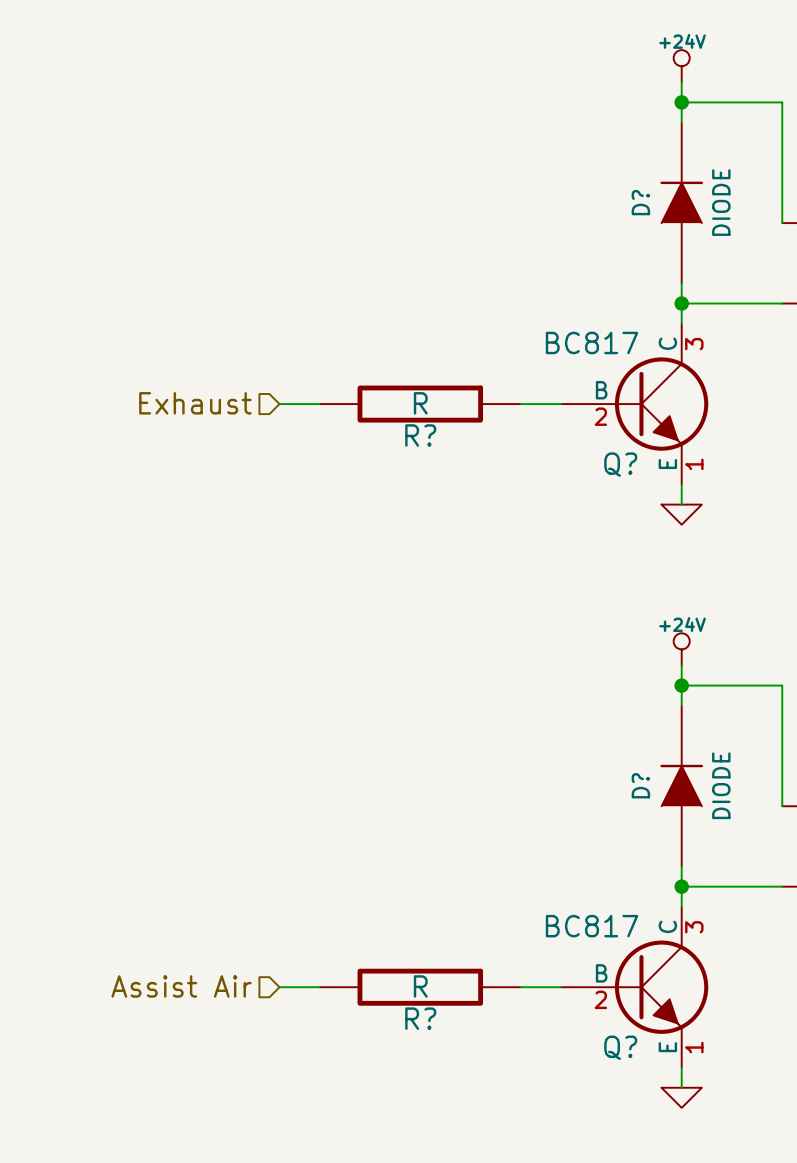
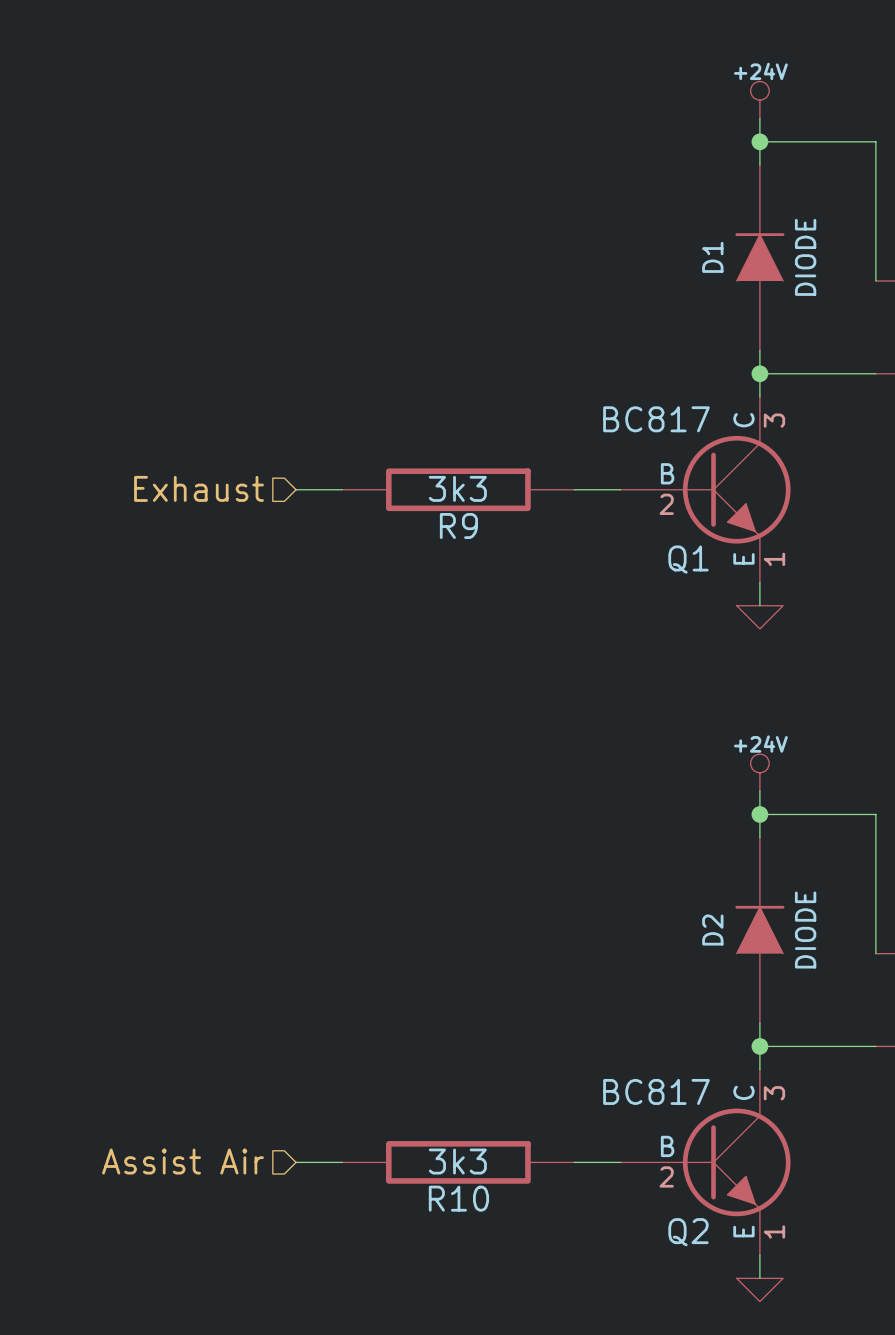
D? name: D? (640, 202) -> D1 (712, 257)
R? value: R (420, 403) -> 3k3 (457, 488)
R? name: R? (420, 435) -> R9 (458, 526)
Q? name: Q? (620, 464) -> Q1 (688, 559)
D? name: D? (640, 785) -> D2 (712, 930)
R? value: R (420, 986) -> 3k3 (457, 1161)
R? name: R? (420, 1018) -> R10 (458, 1198)
Q? name: Q? (620, 1047) -> Q2 (688, 1232)

